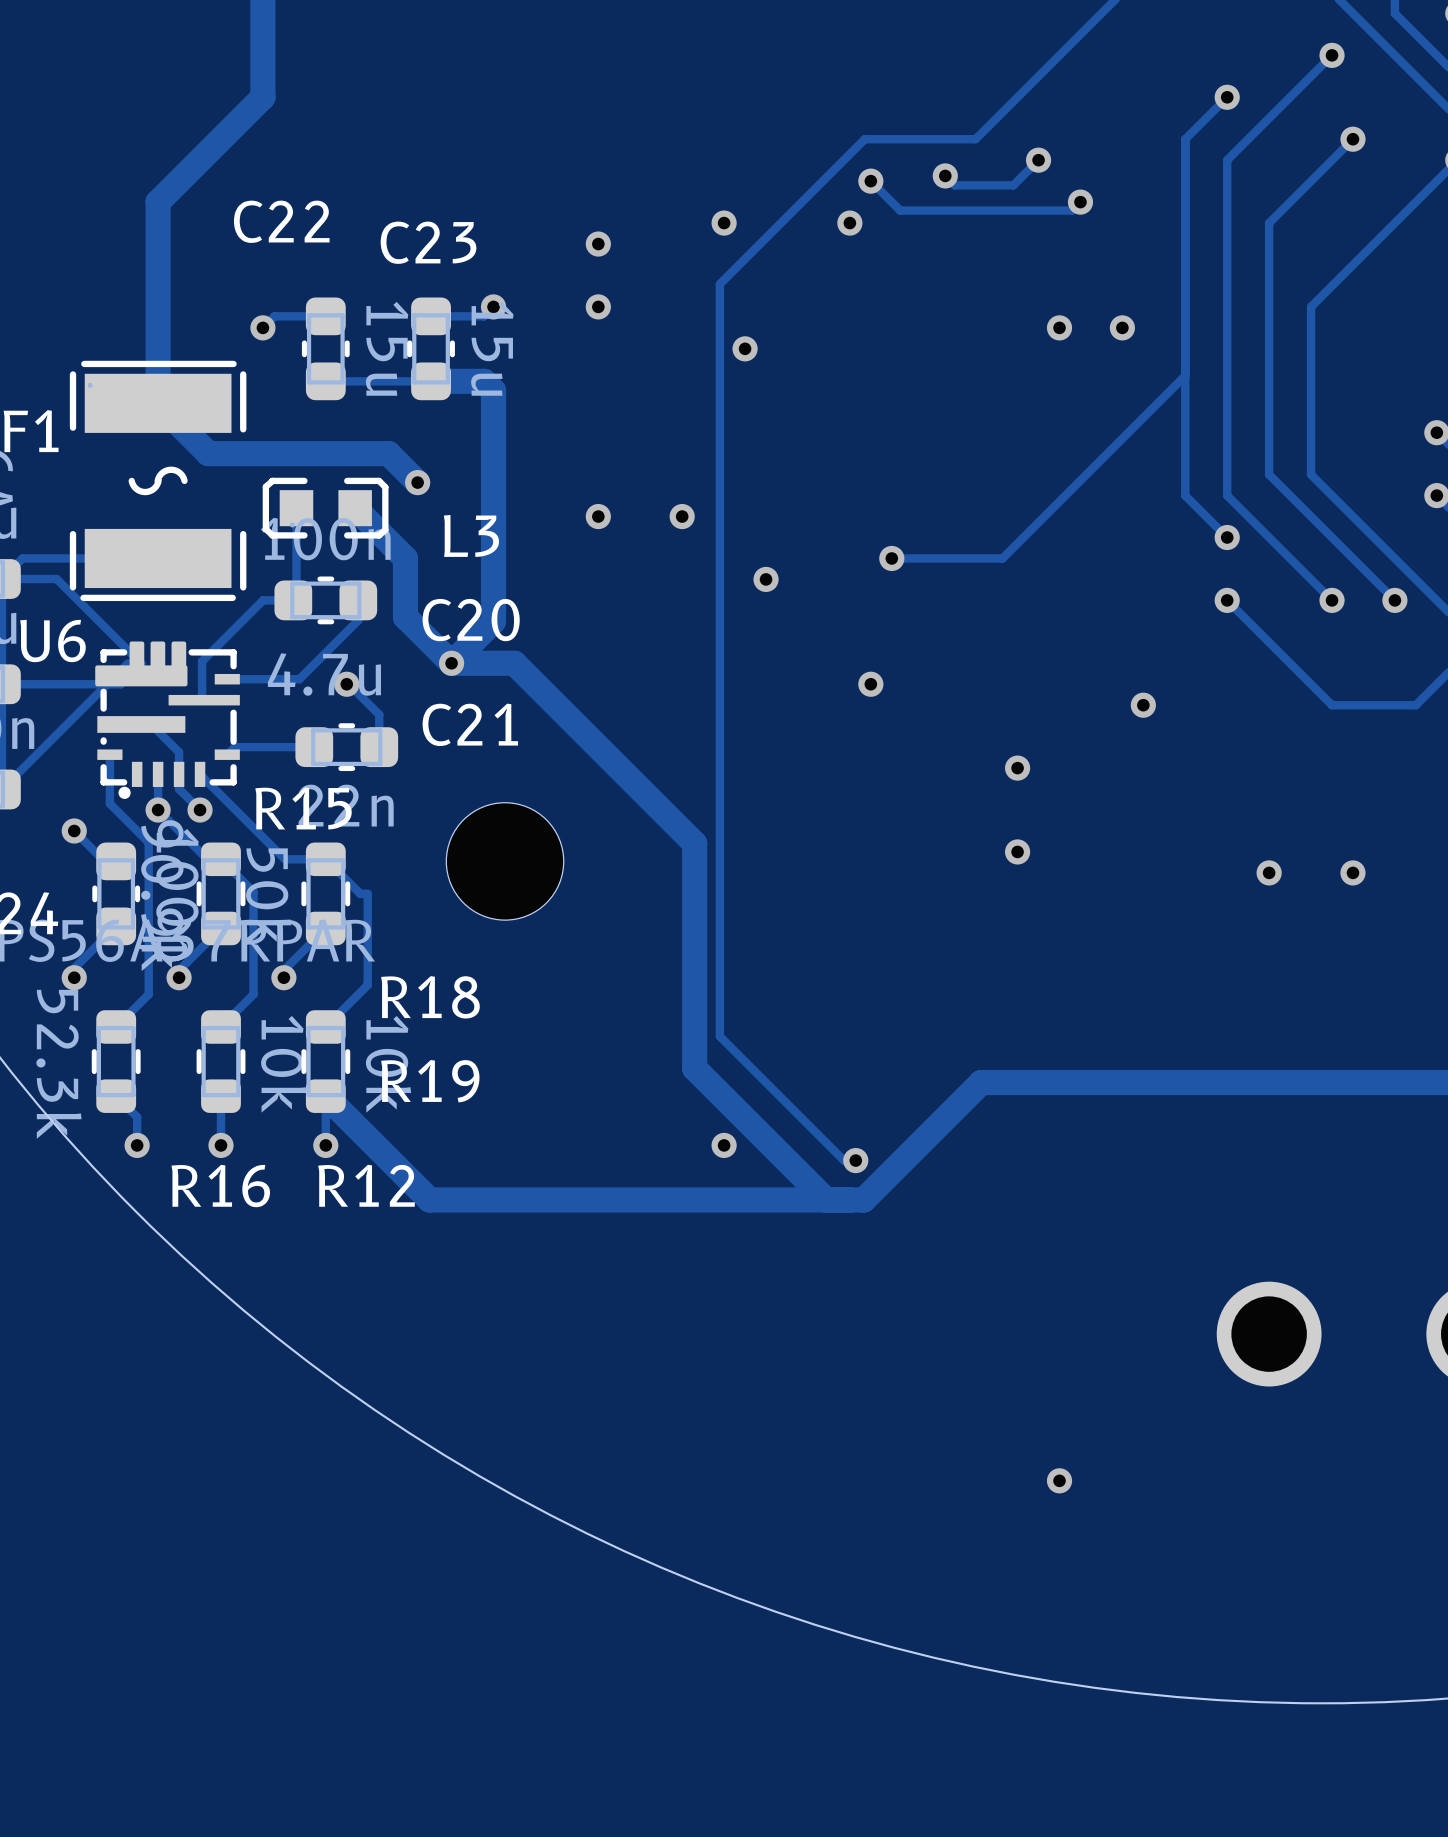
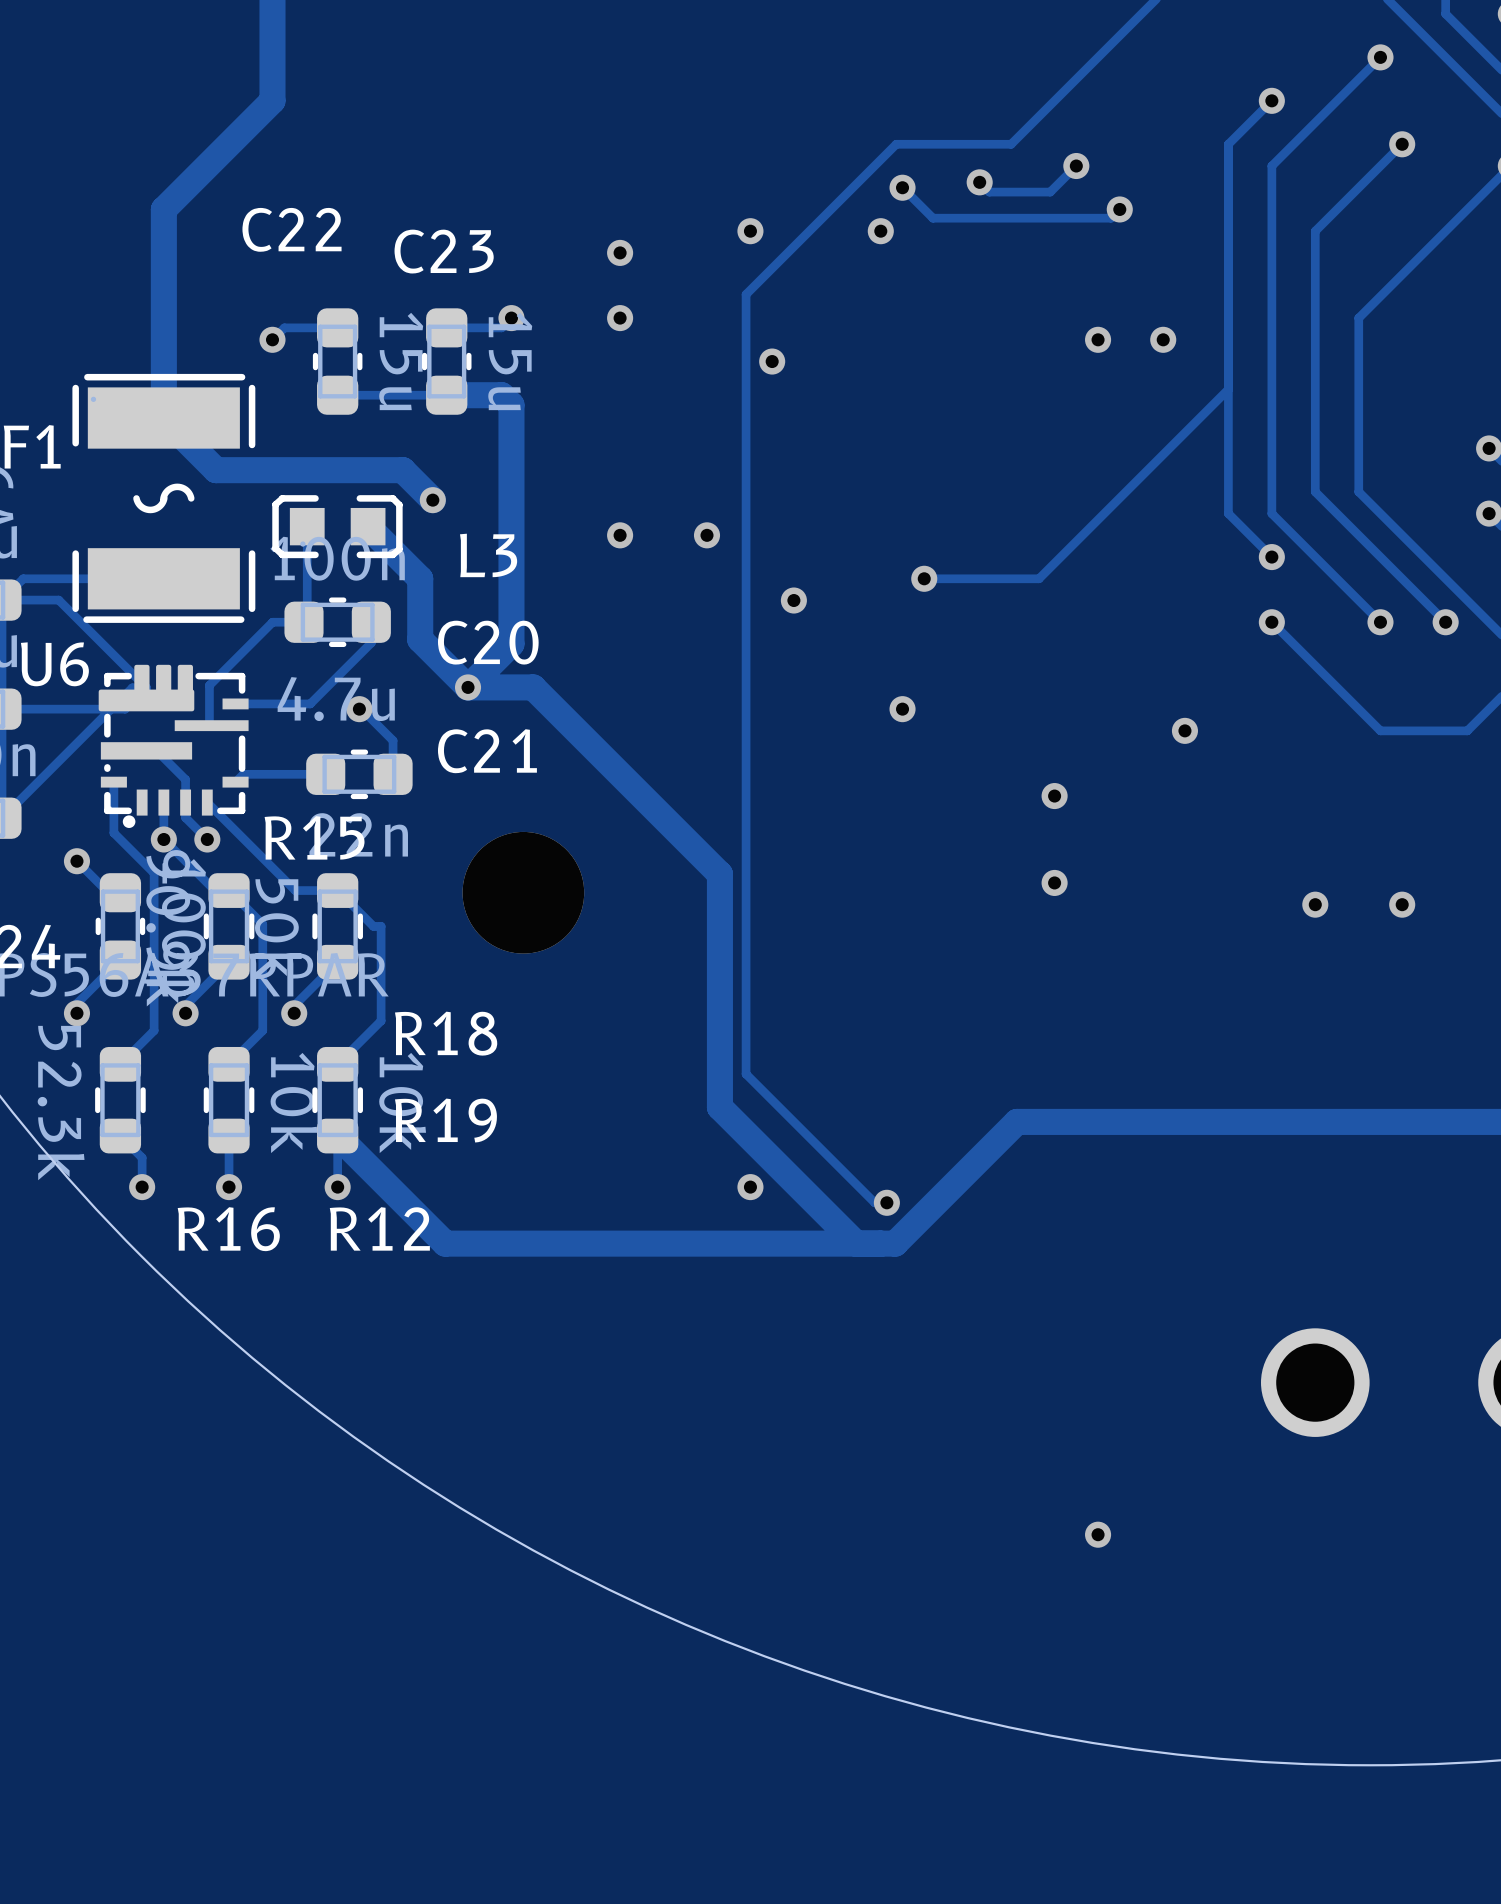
part footprint: [446, 802, 564, 921] -> [462, 831, 585, 954]

